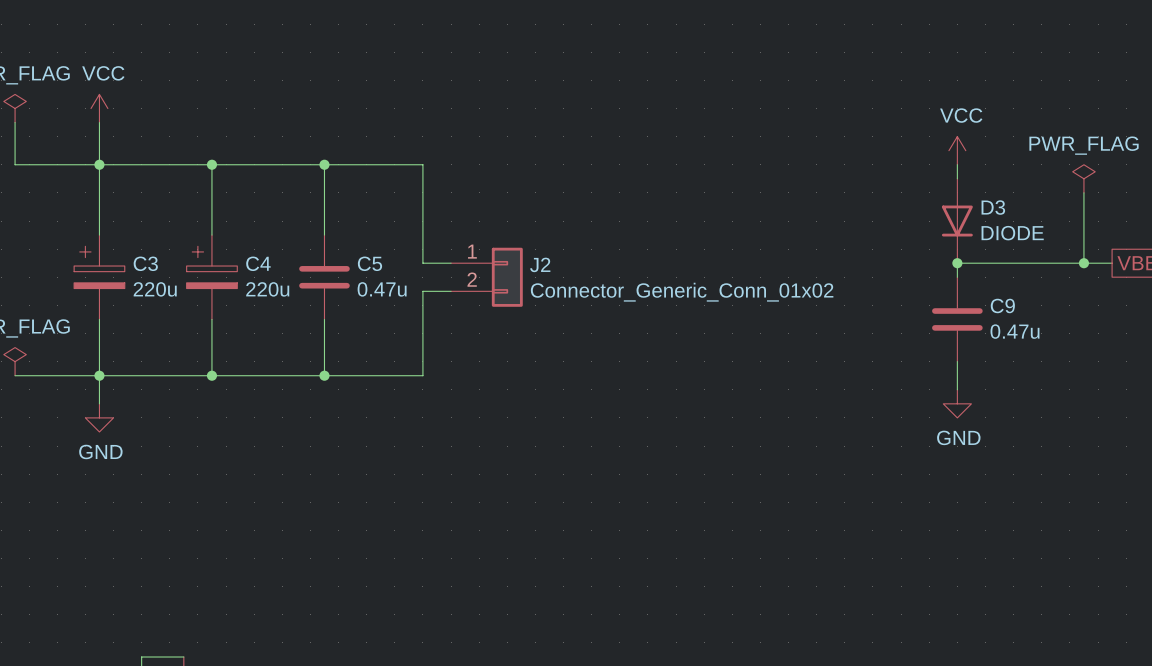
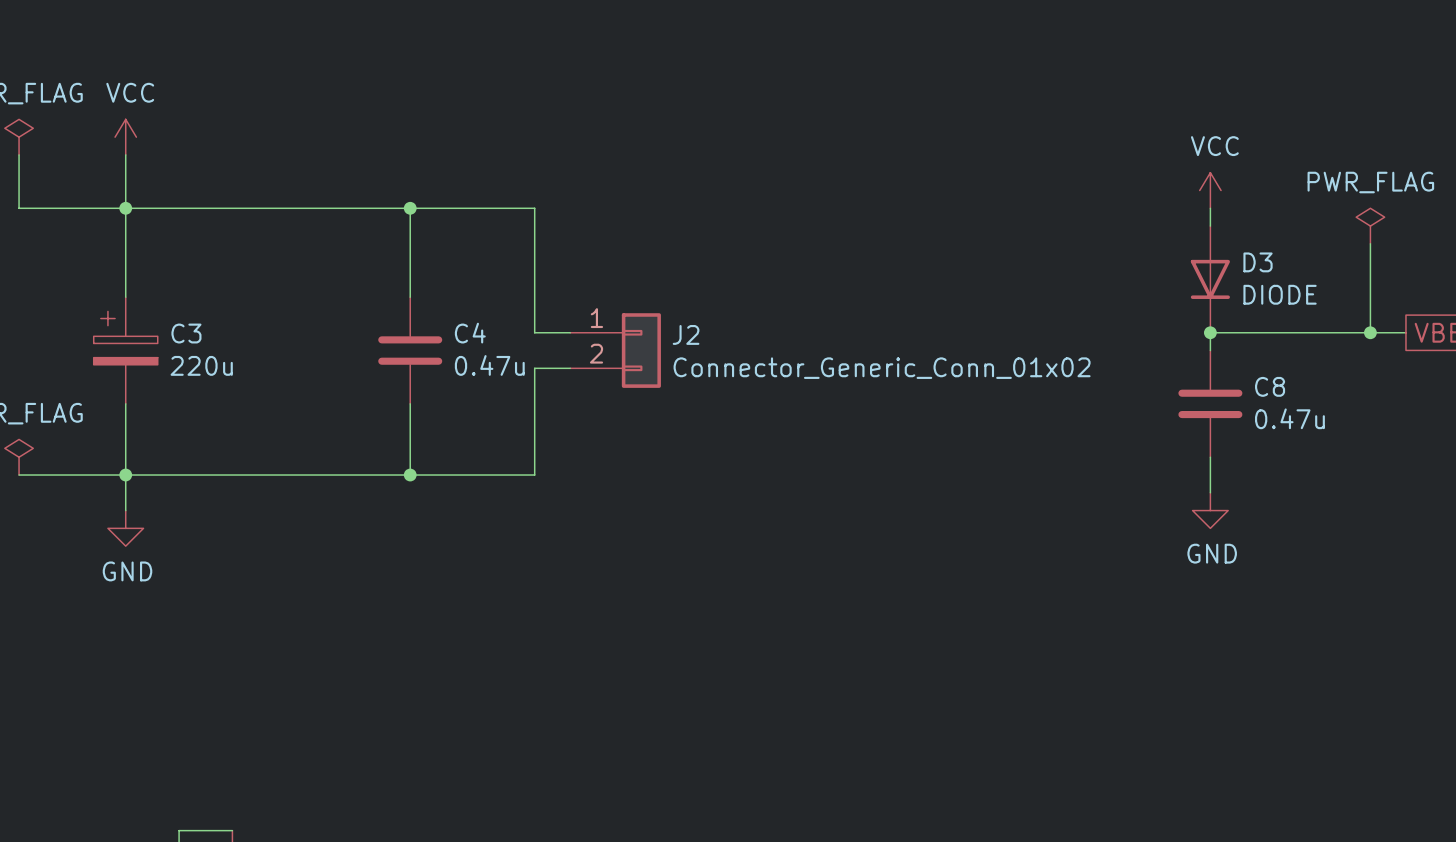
wire: (211, 164) (211, 235) -> none
junction: (211, 164) -> none
C5 name: C5 (369, 263) -> C4 (470, 333)
C4: 220u (211, 277) -> none
C9 name: C9 (1002, 305) -> C8 (1270, 386)
wire: (211, 319) (211, 375) -> none
junction: (211, 375) -> none

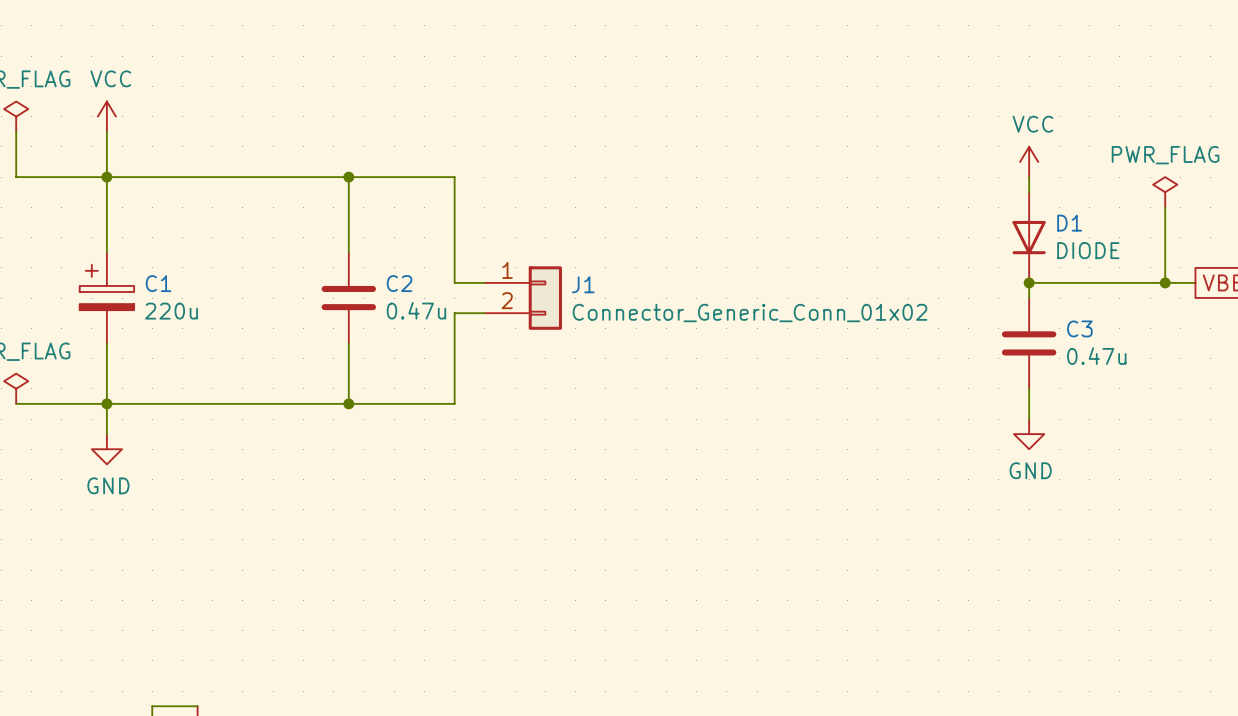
D3 name: D3 (1258, 262) -> D1 (1069, 223)
C3 name: C3 (186, 333) -> C1 (158, 283)
C4 name: C4 (470, 333) -> C2 (399, 283)
J2 name: J2 (686, 334) -> J1 (583, 284)
C8 name: C8 (1270, 386) -> C3 (1079, 328)

